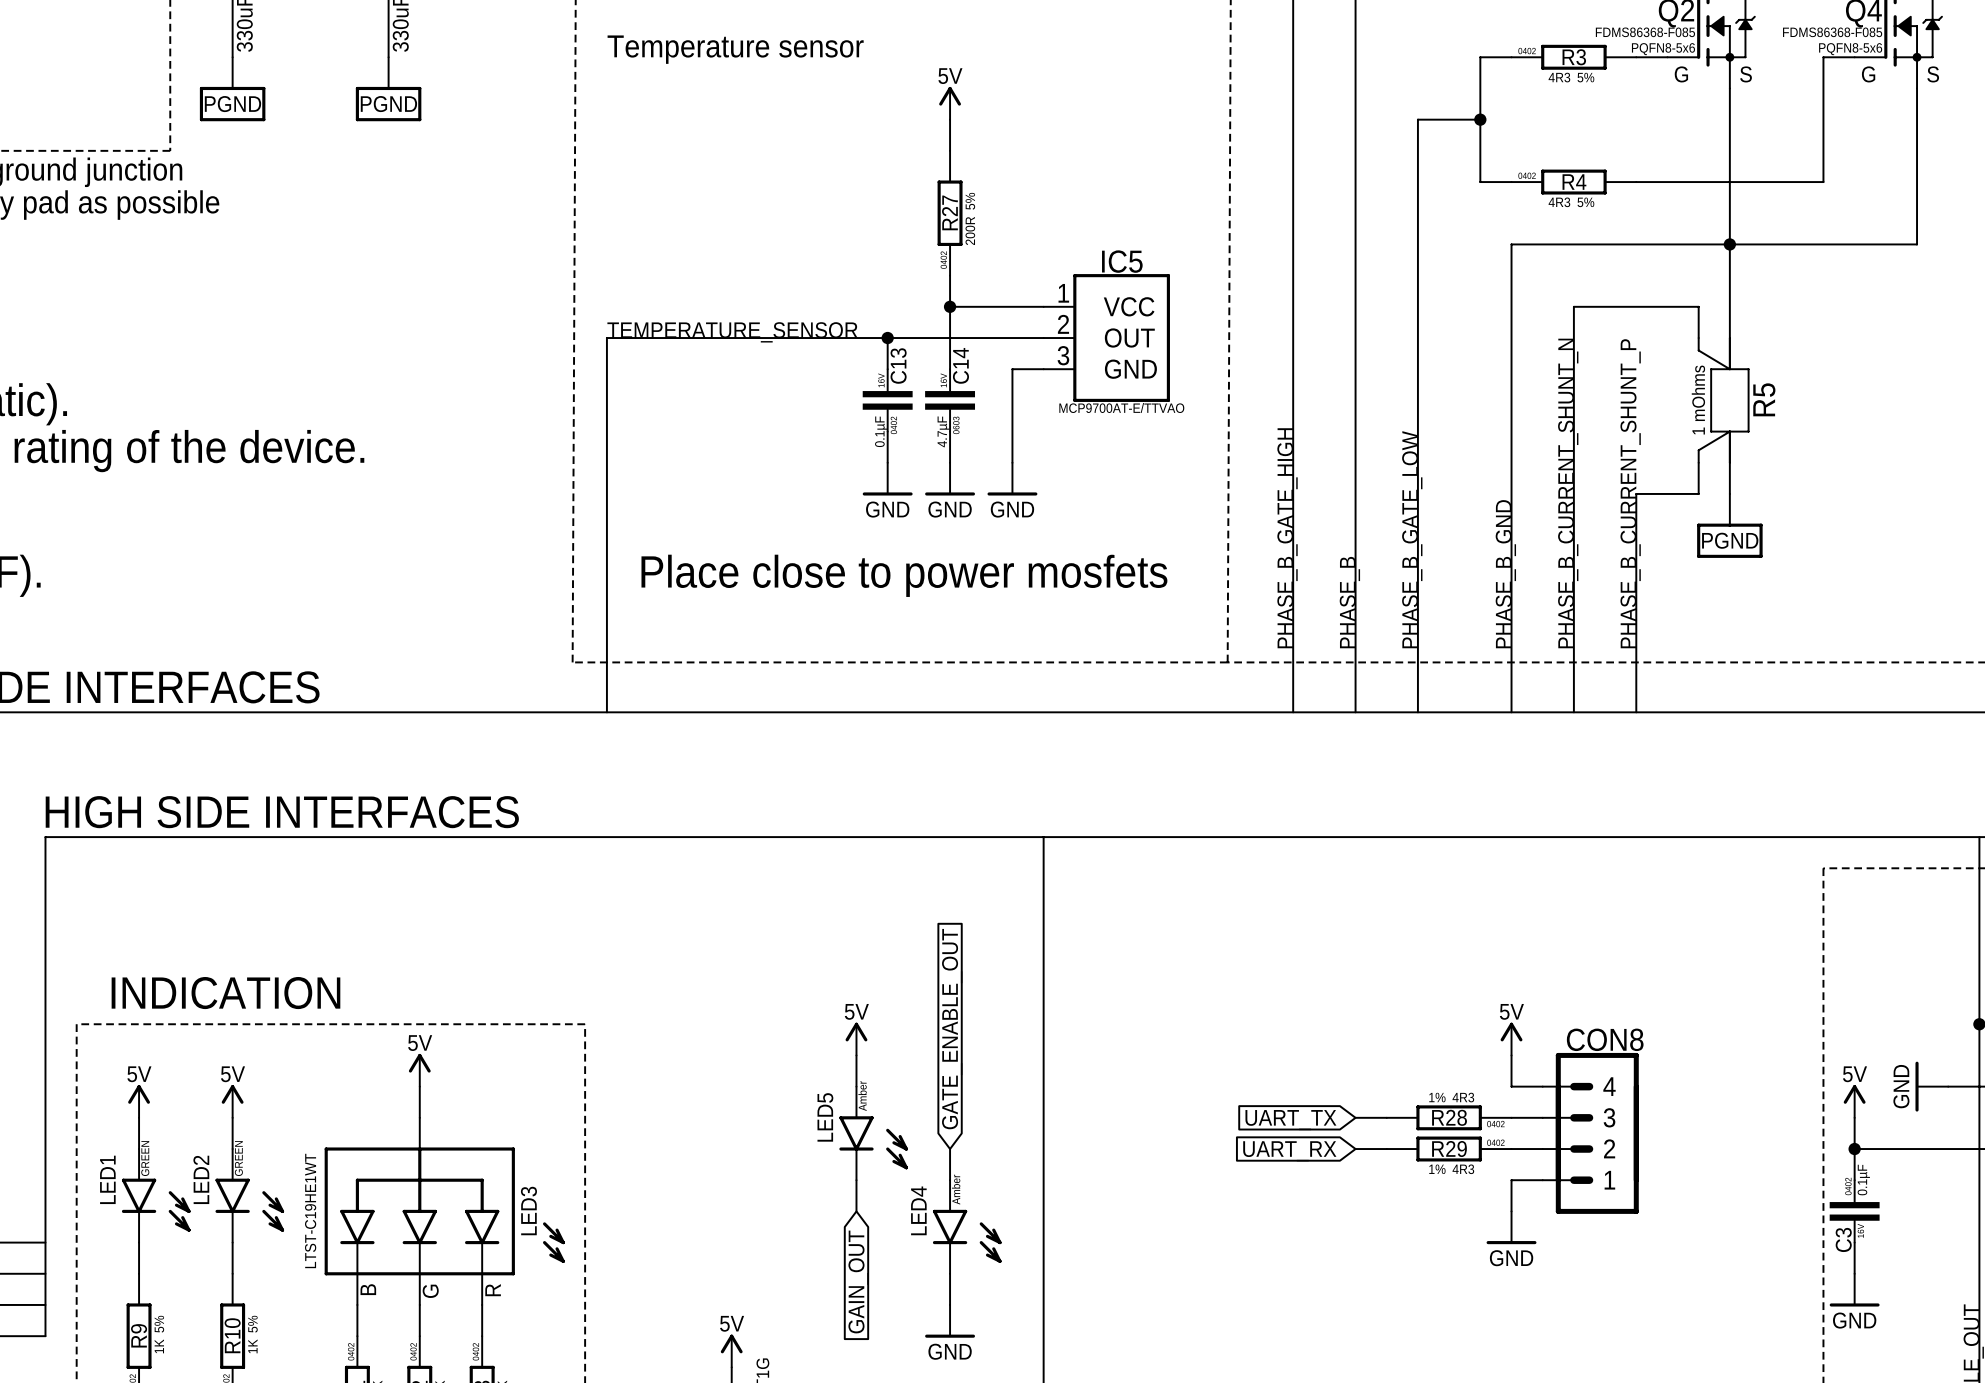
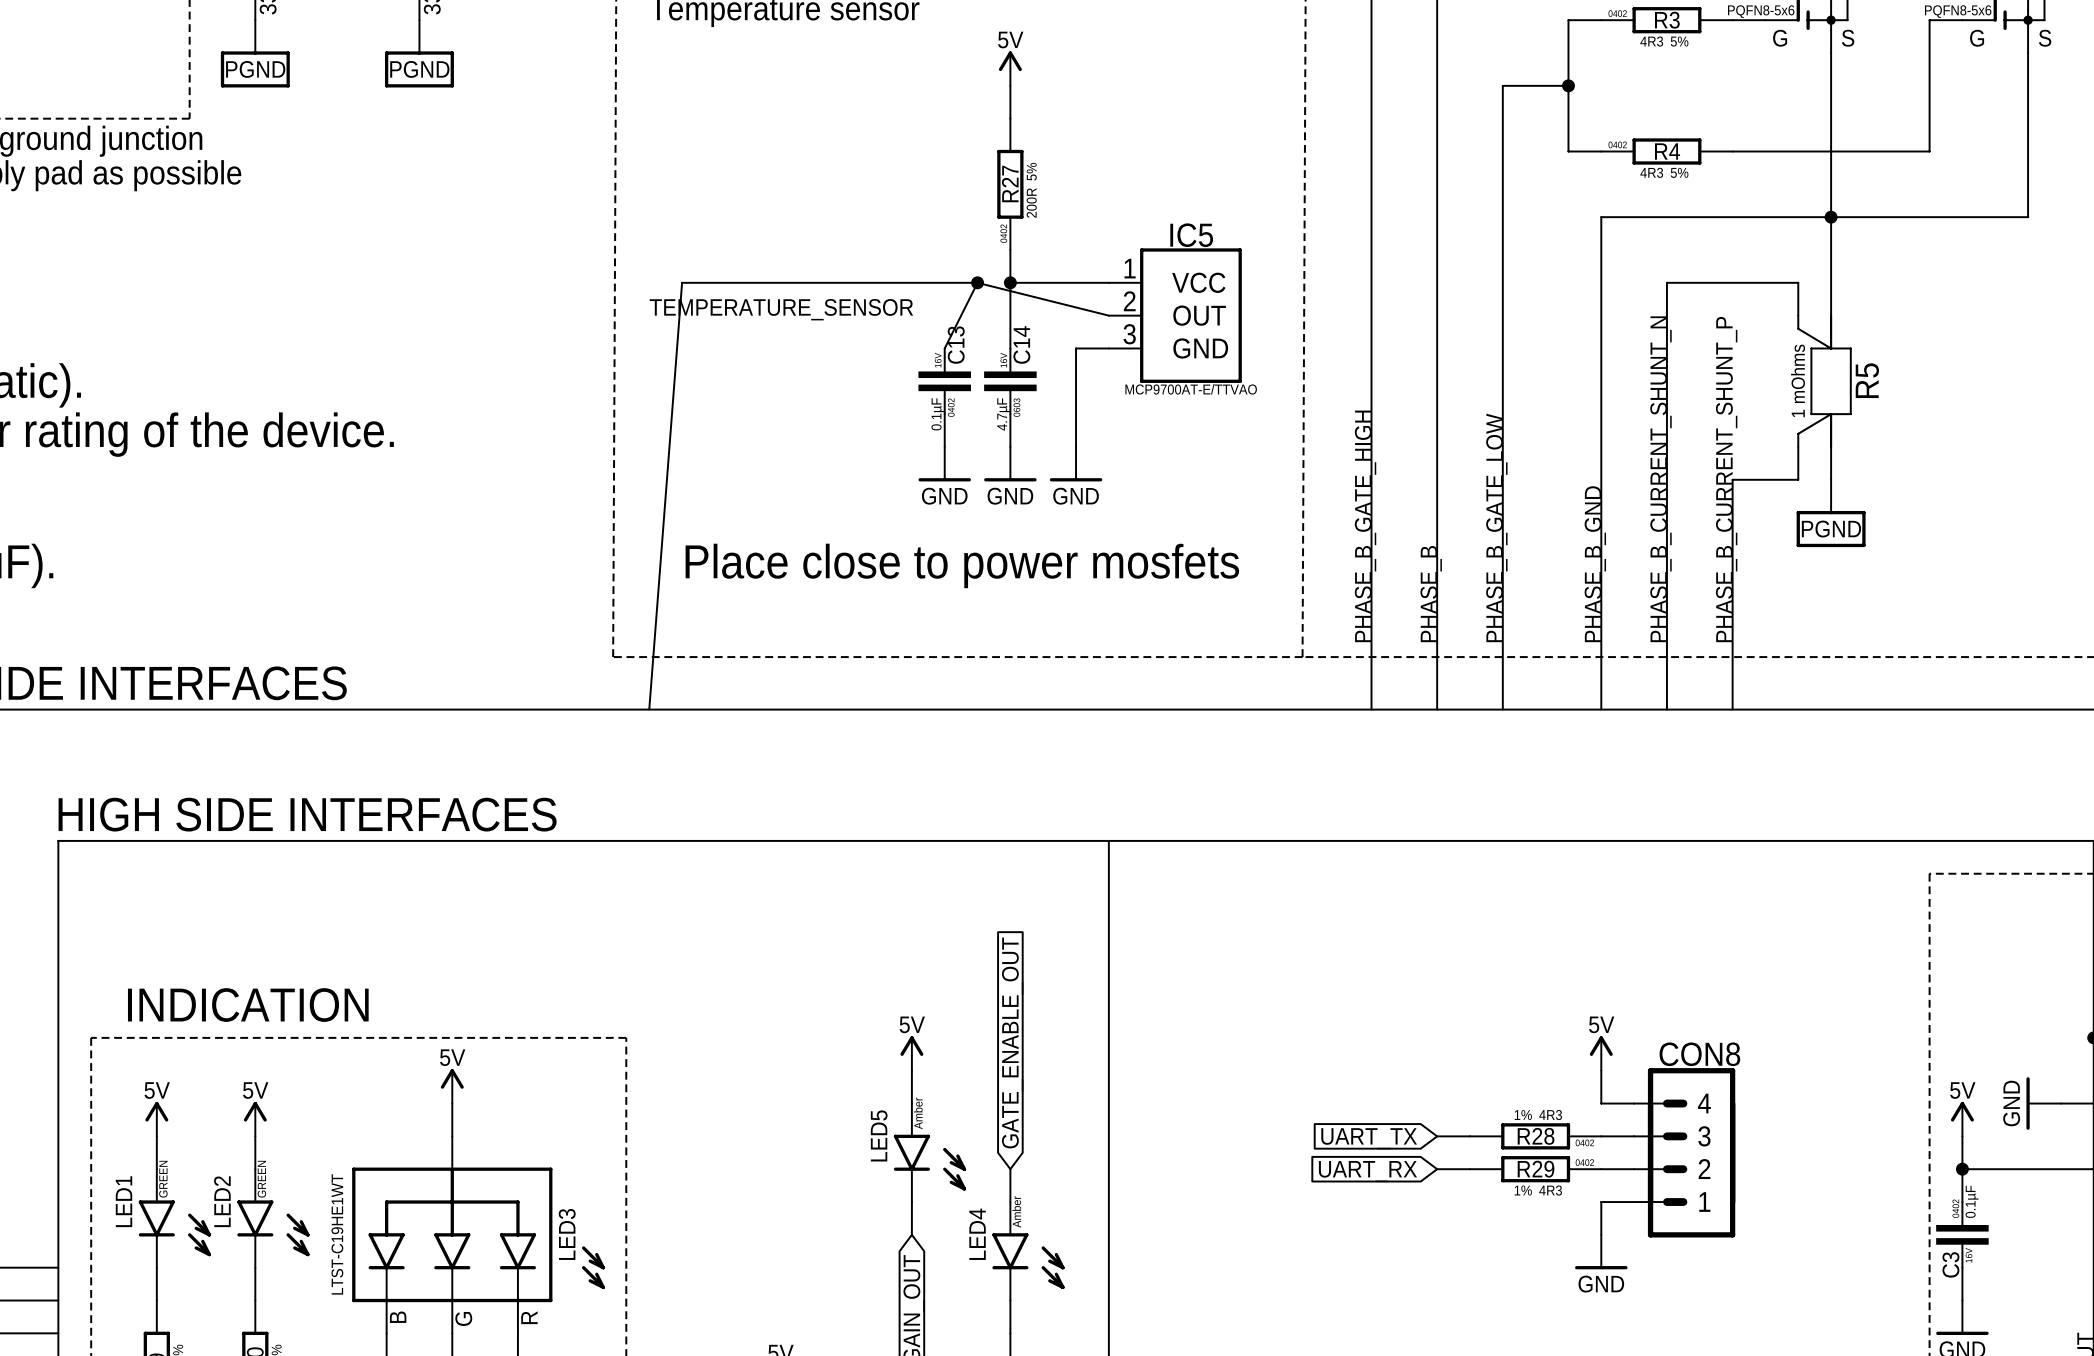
wire: none -> (977, 282) (1108, 315)
wire: (887, 338) (887, 369) -> (977, 282) (944, 348)
junction position: (887, 338) -> (977, 282)
wire: (1043, 338) (606, 338) (606, 712) -> (977, 282) (682, 282) (649, 709)

